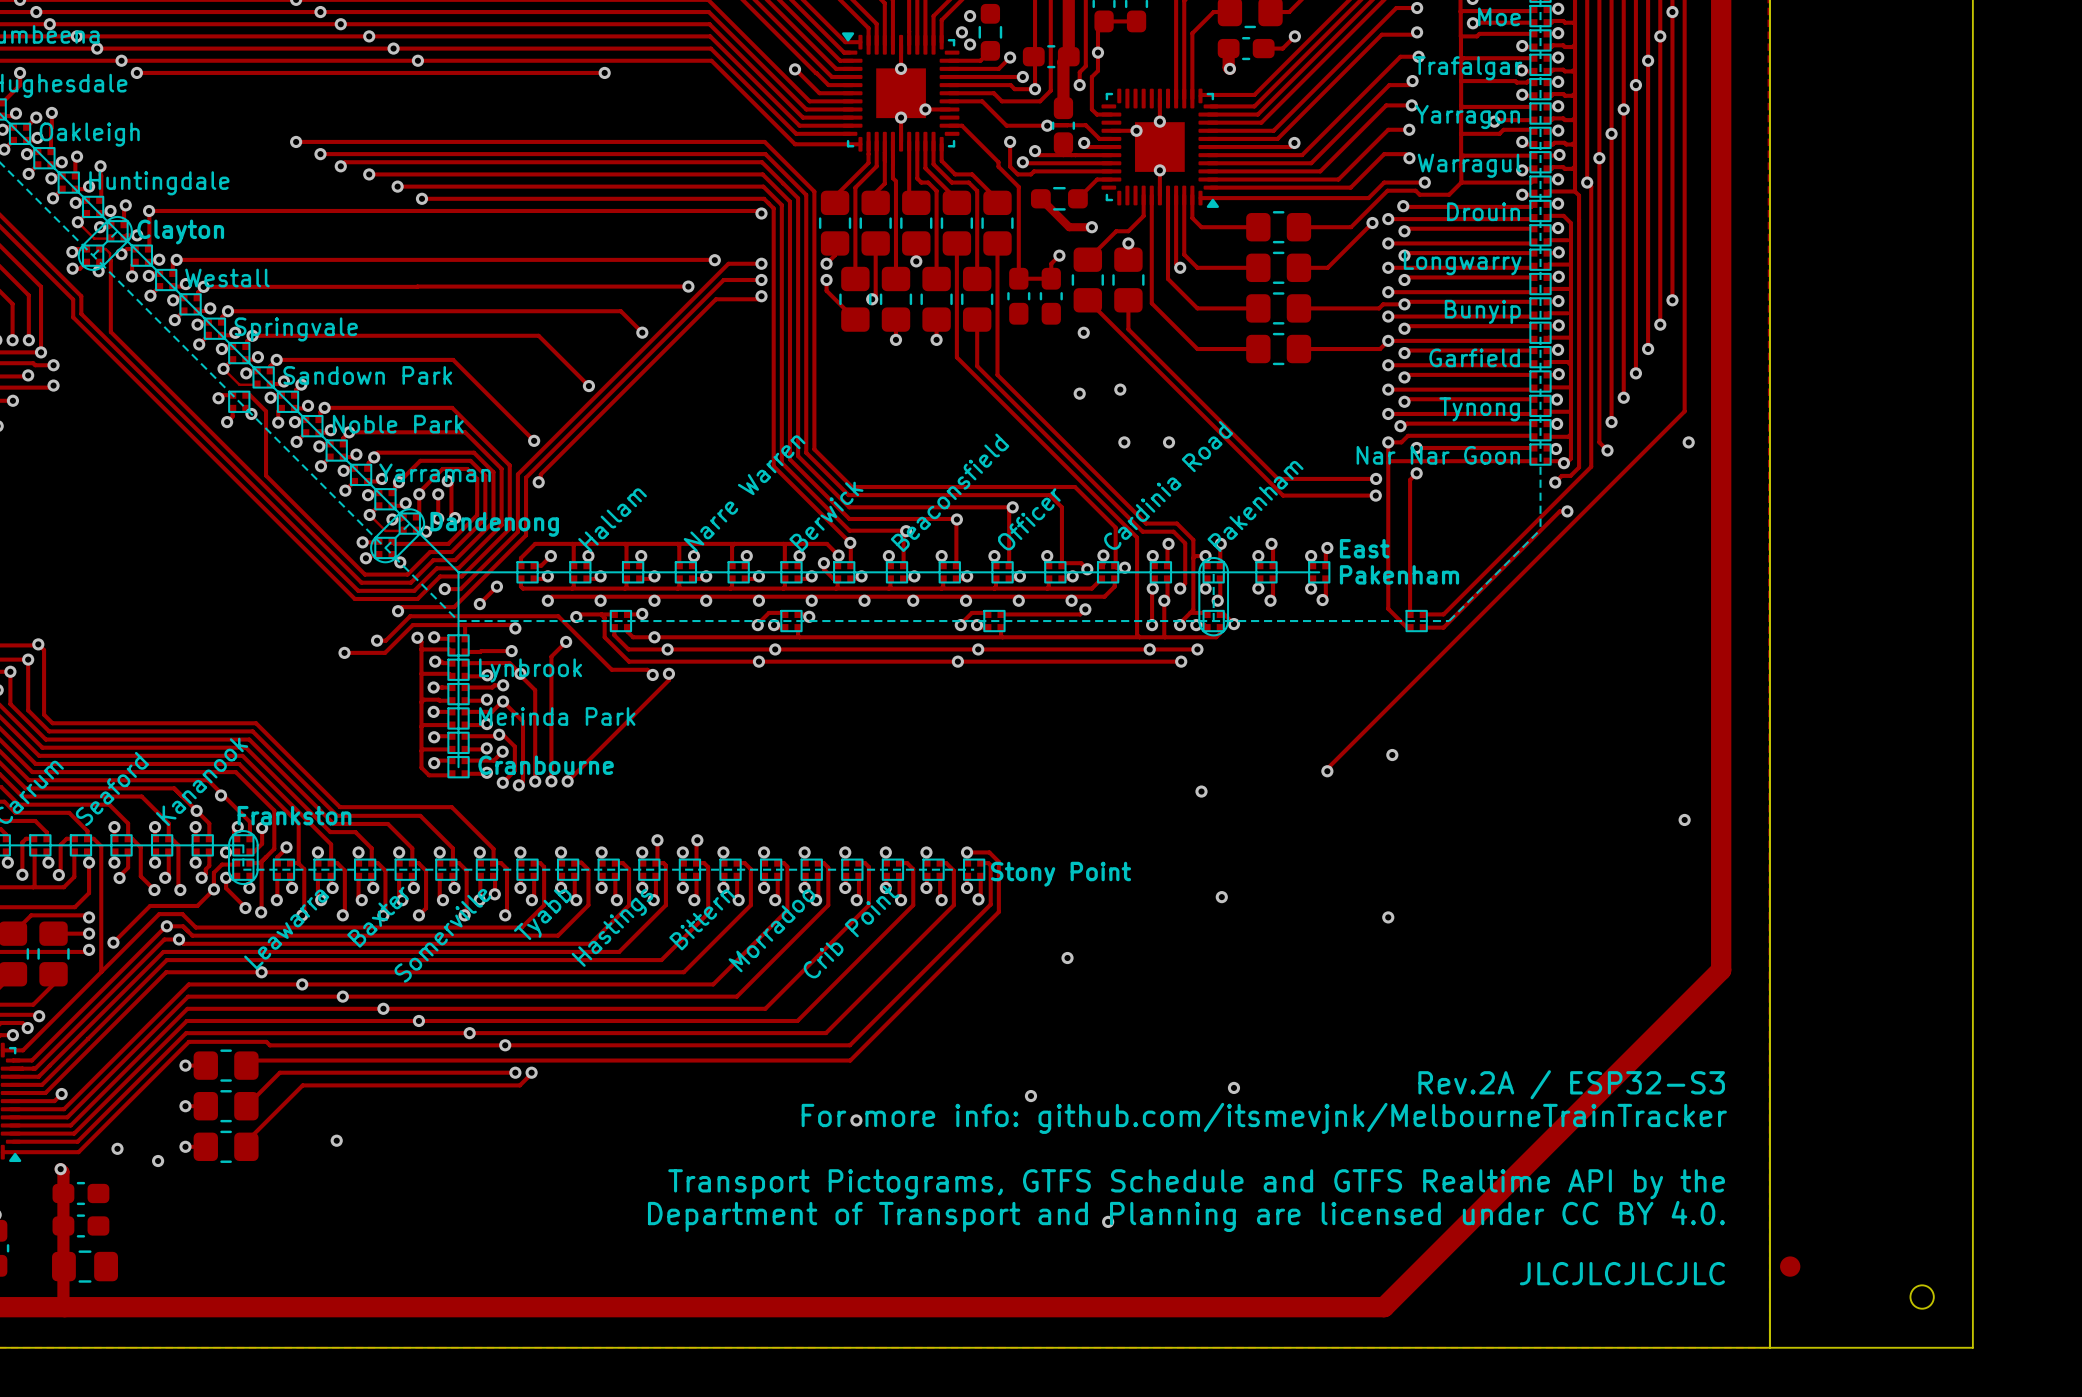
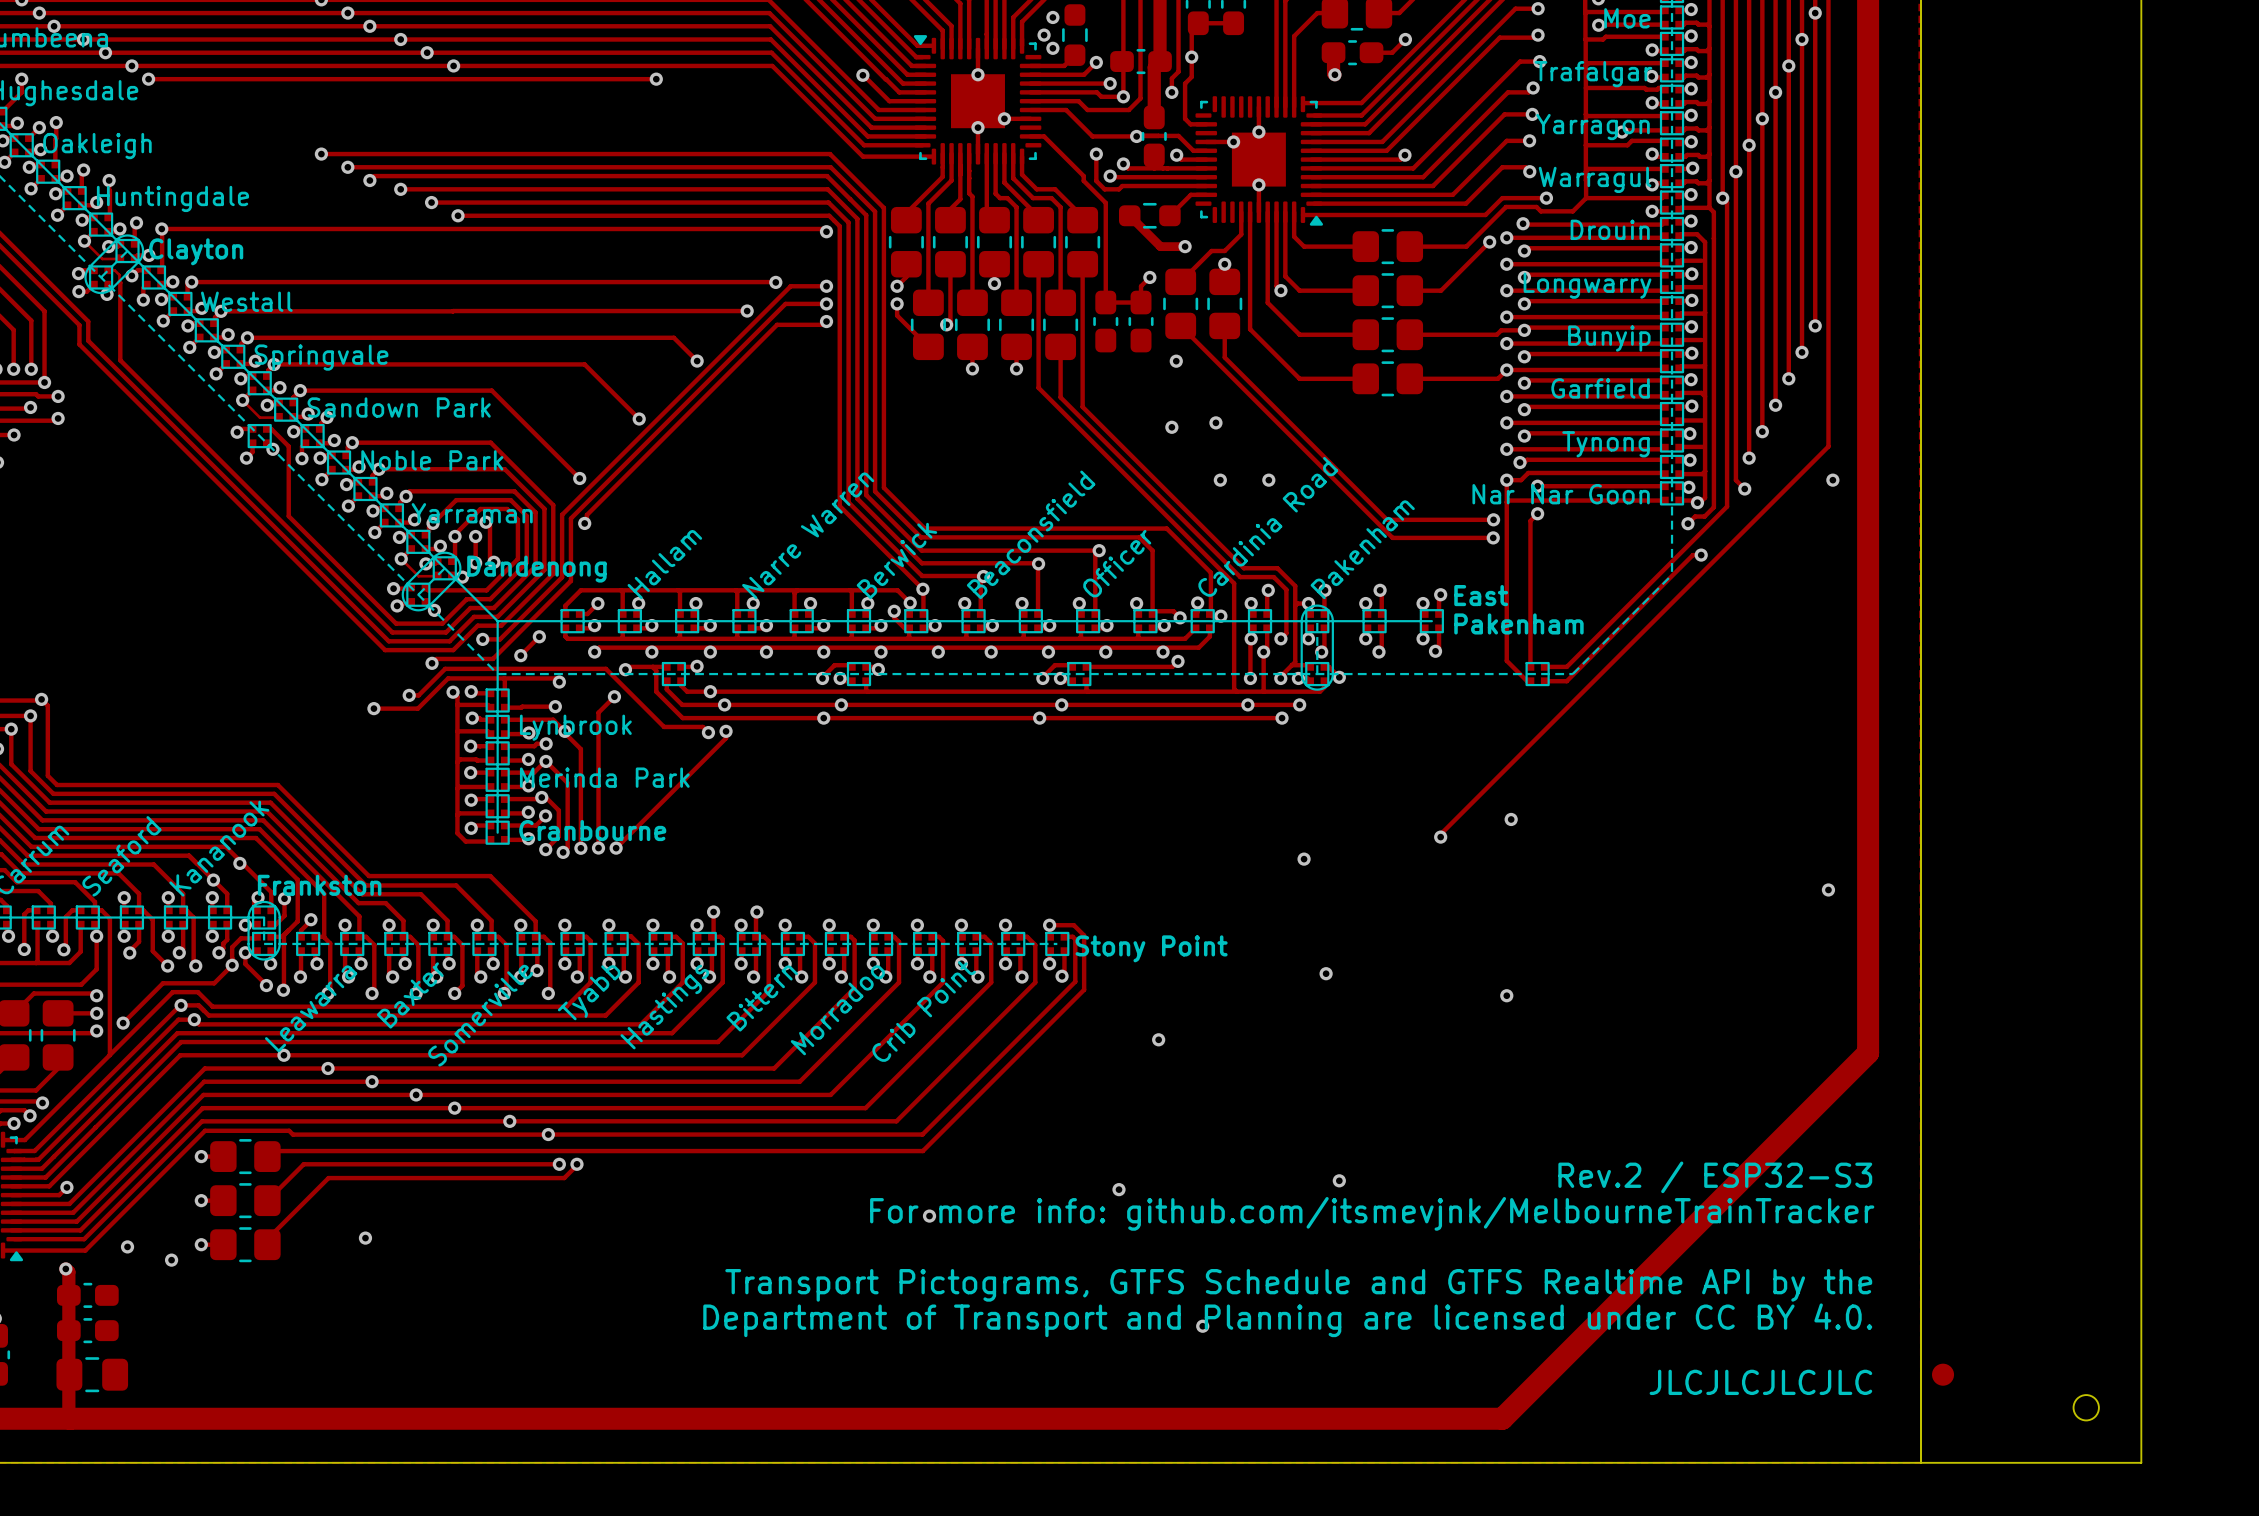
text: Rev.2A / ESP32-S3 (1571, 1084) -> Rev.2 / ESP32-S3 (1715, 1177)

